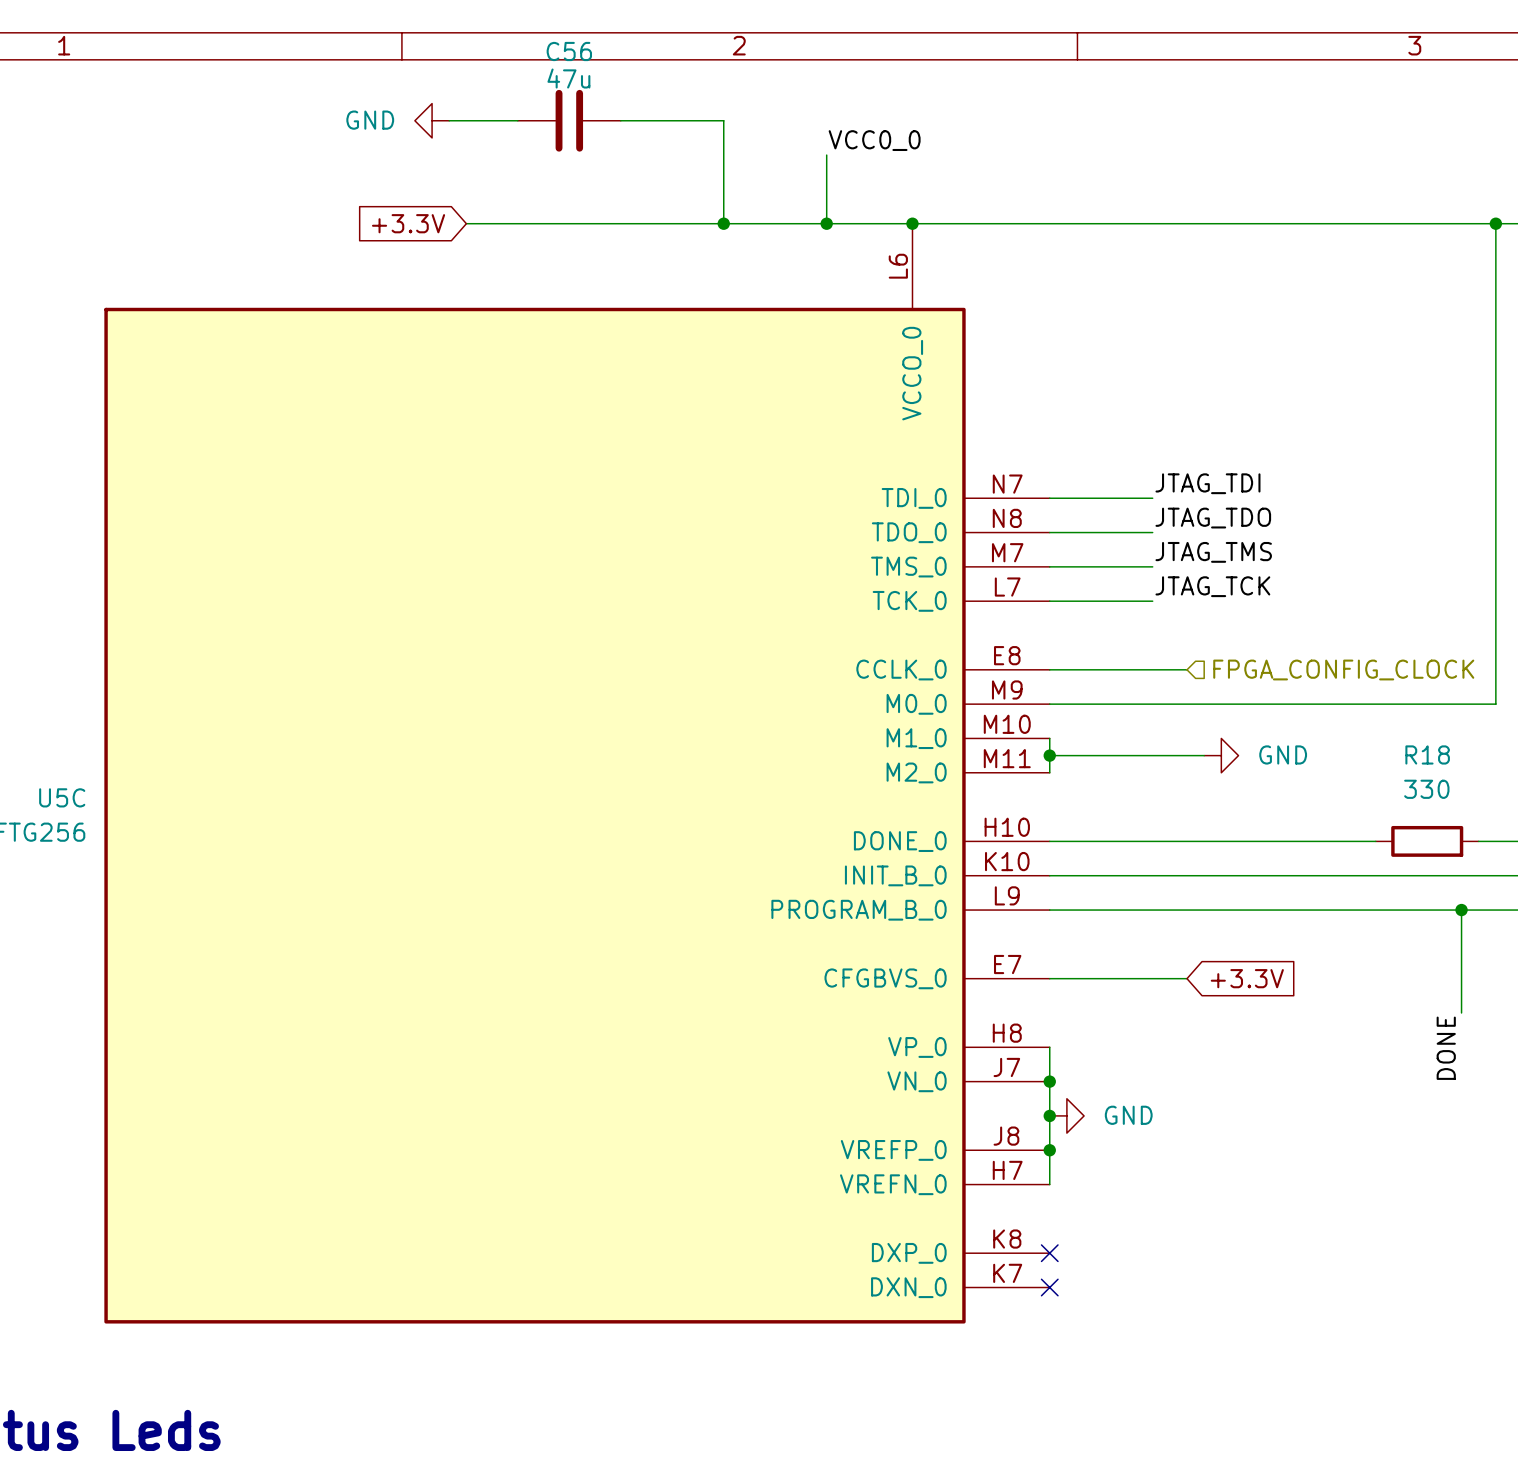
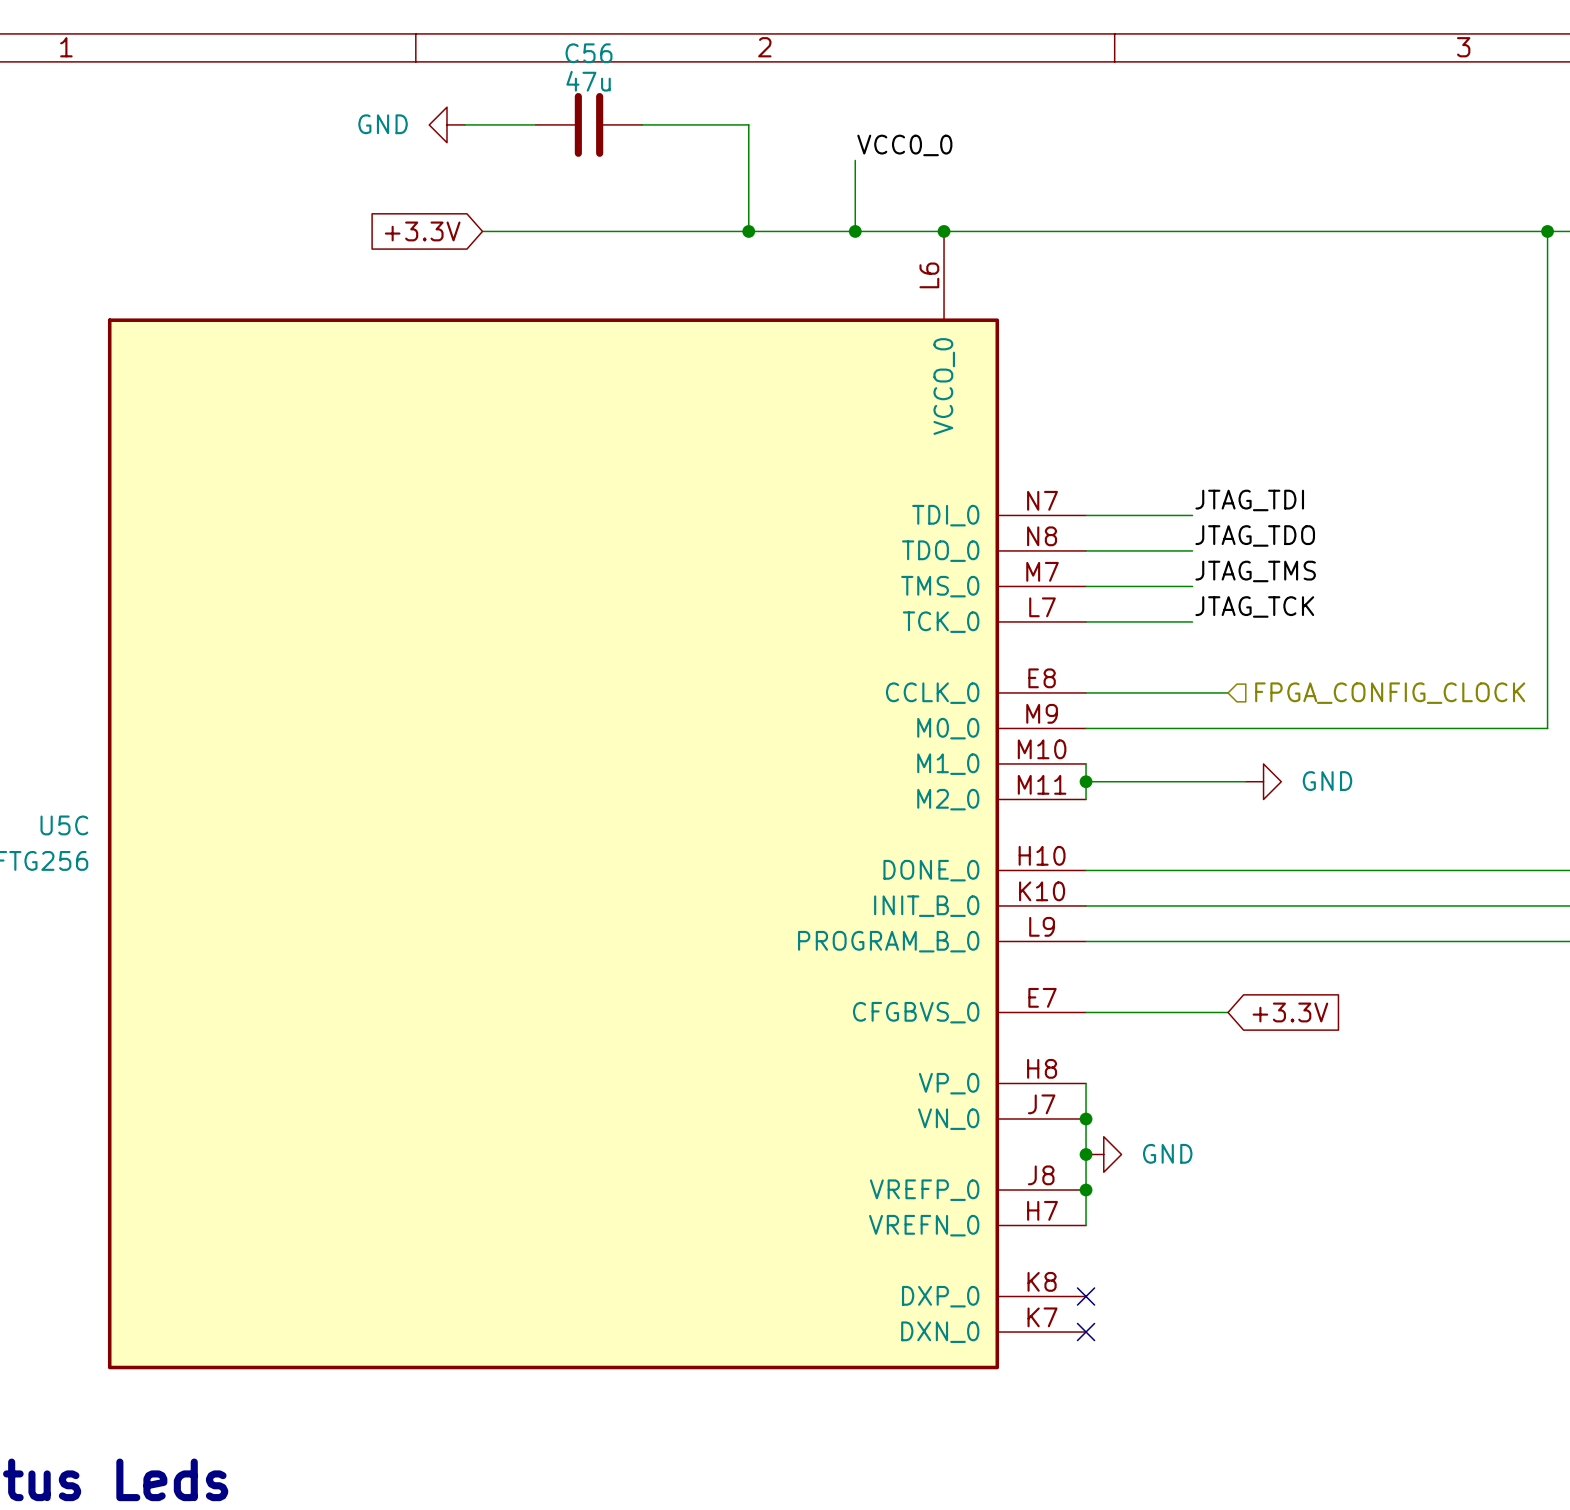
wire: none -> (1423, 870) (1529, 870)
R18: 330 (1427, 841) -> none
wire: (1461, 910) (1461, 1012) -> none
junction: (1461, 910) -> none
label: DONE (1446, 1048) -> none

